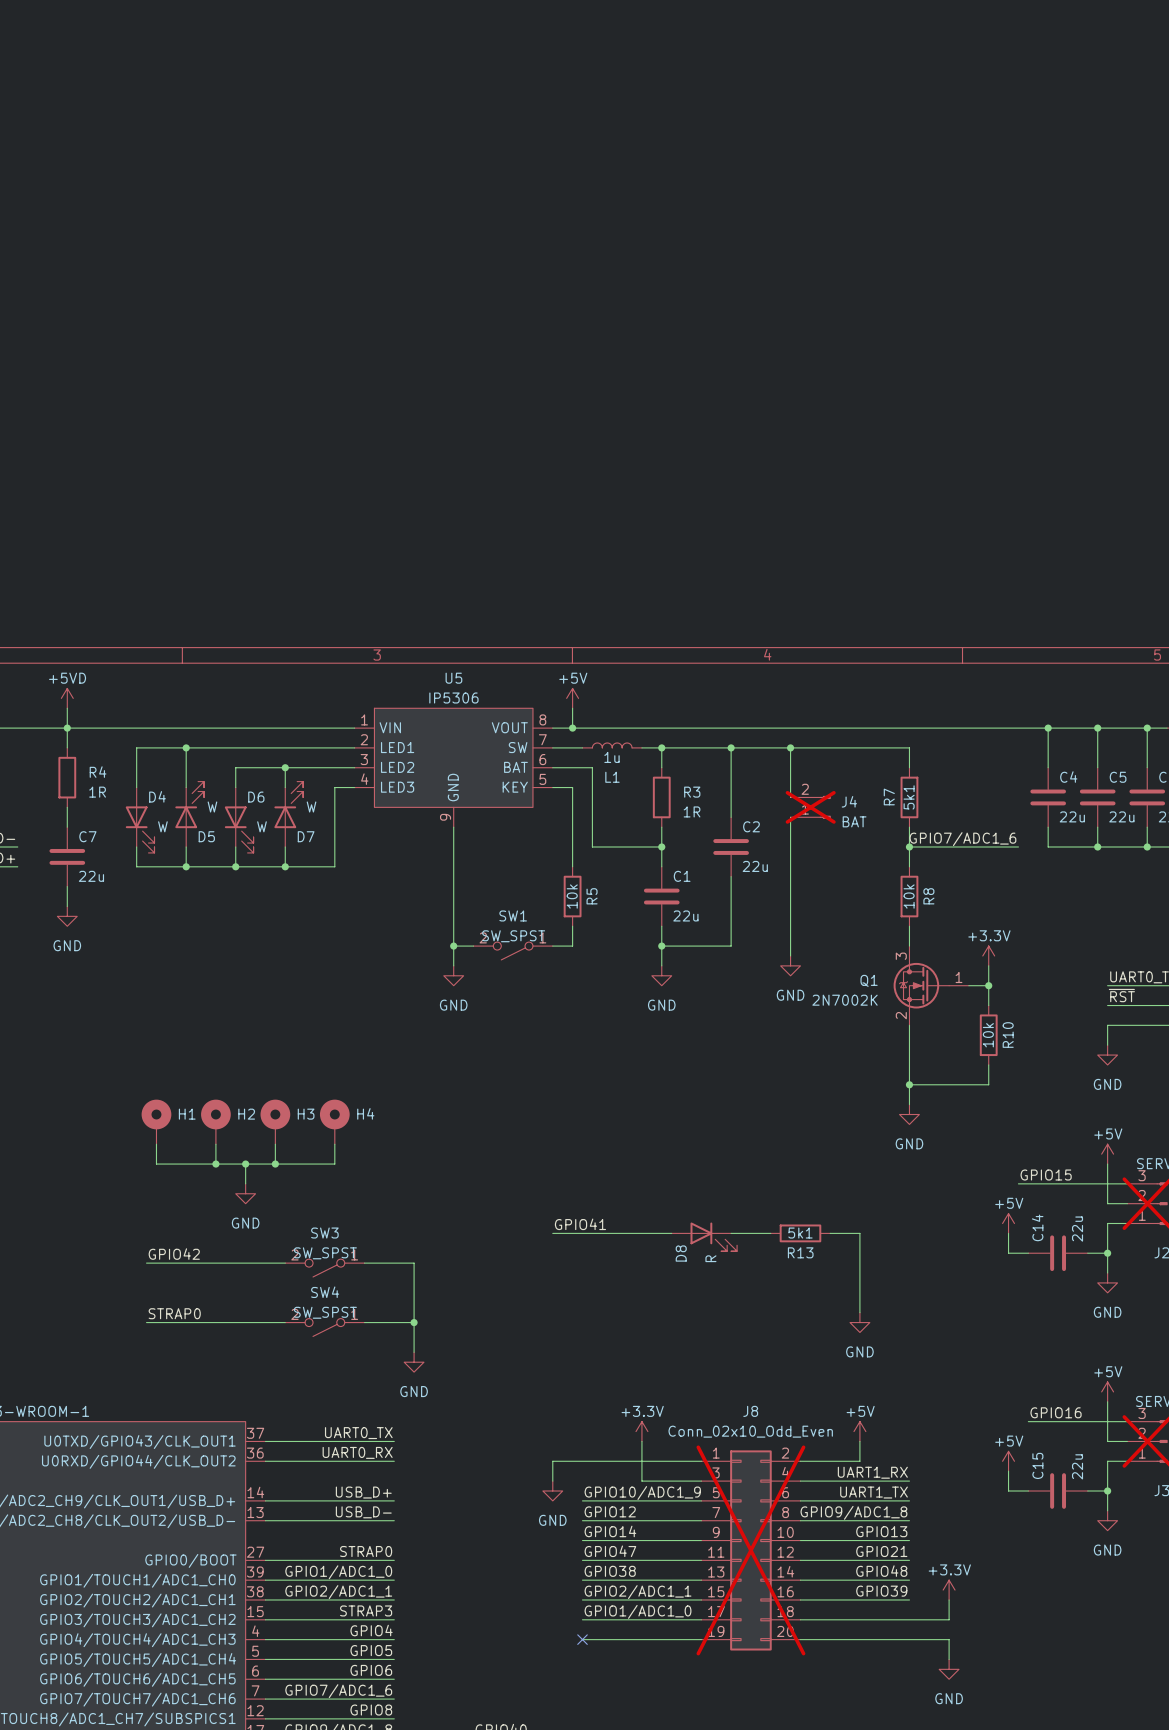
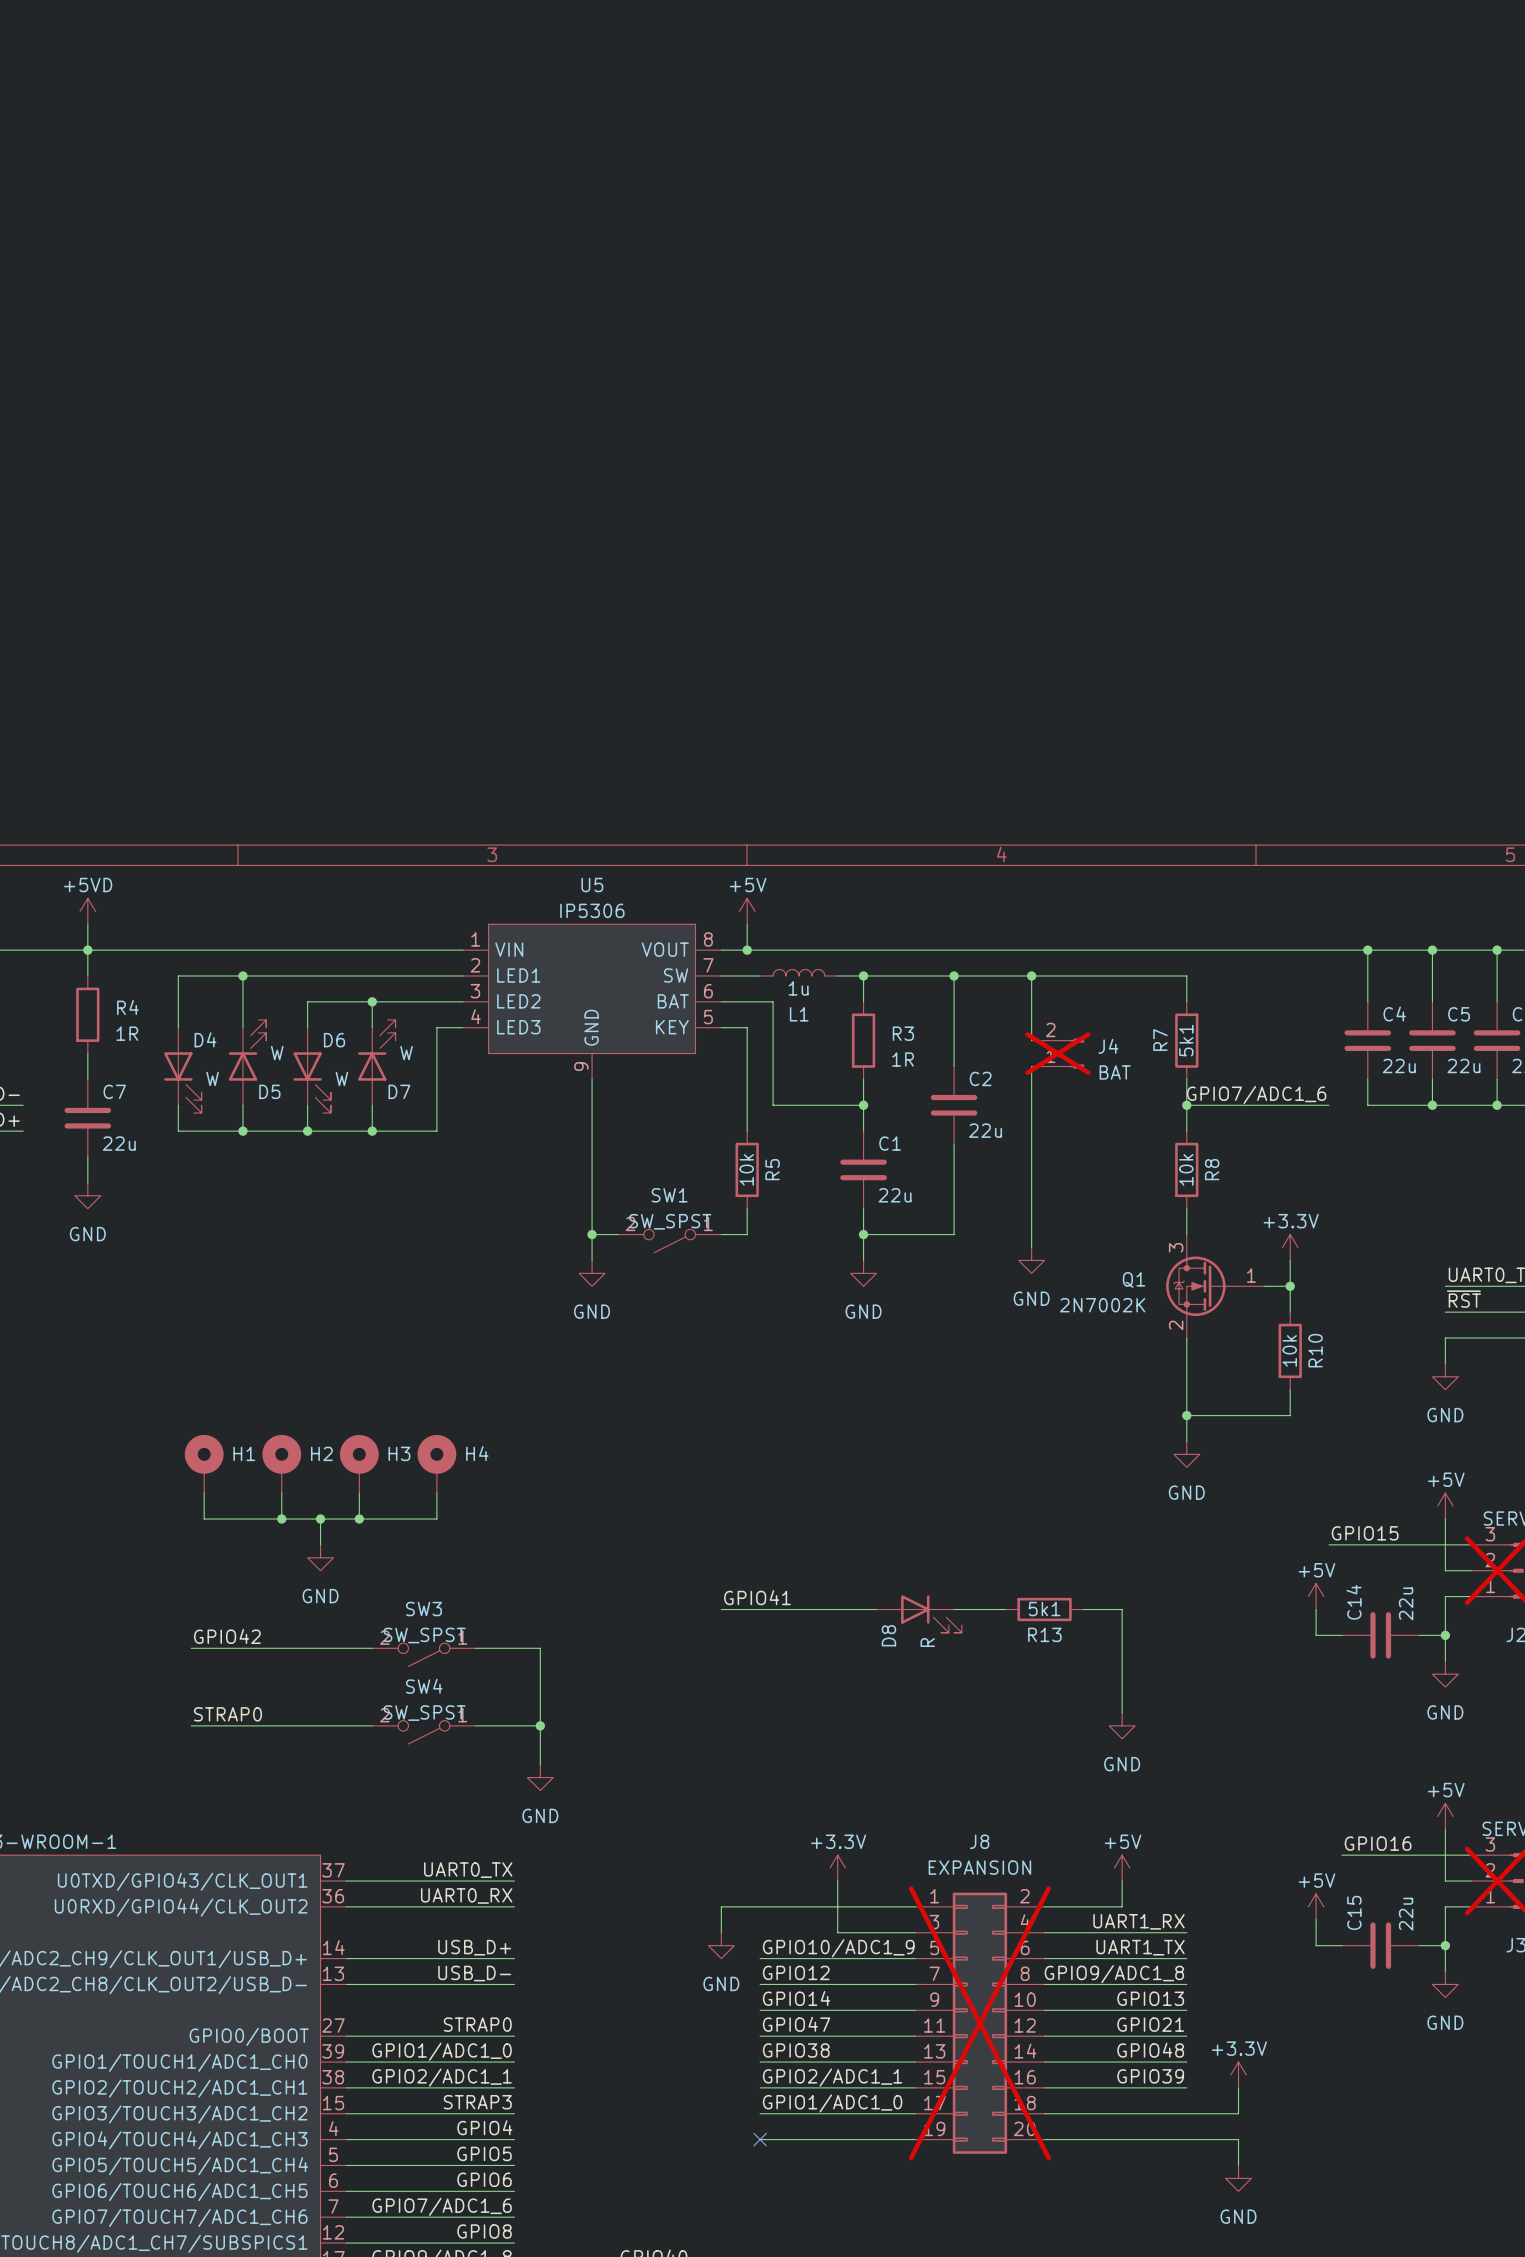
J8 value: Conn_02x10_Odd_Even (750, 1431) -> EXPANSION (979, 1867)

